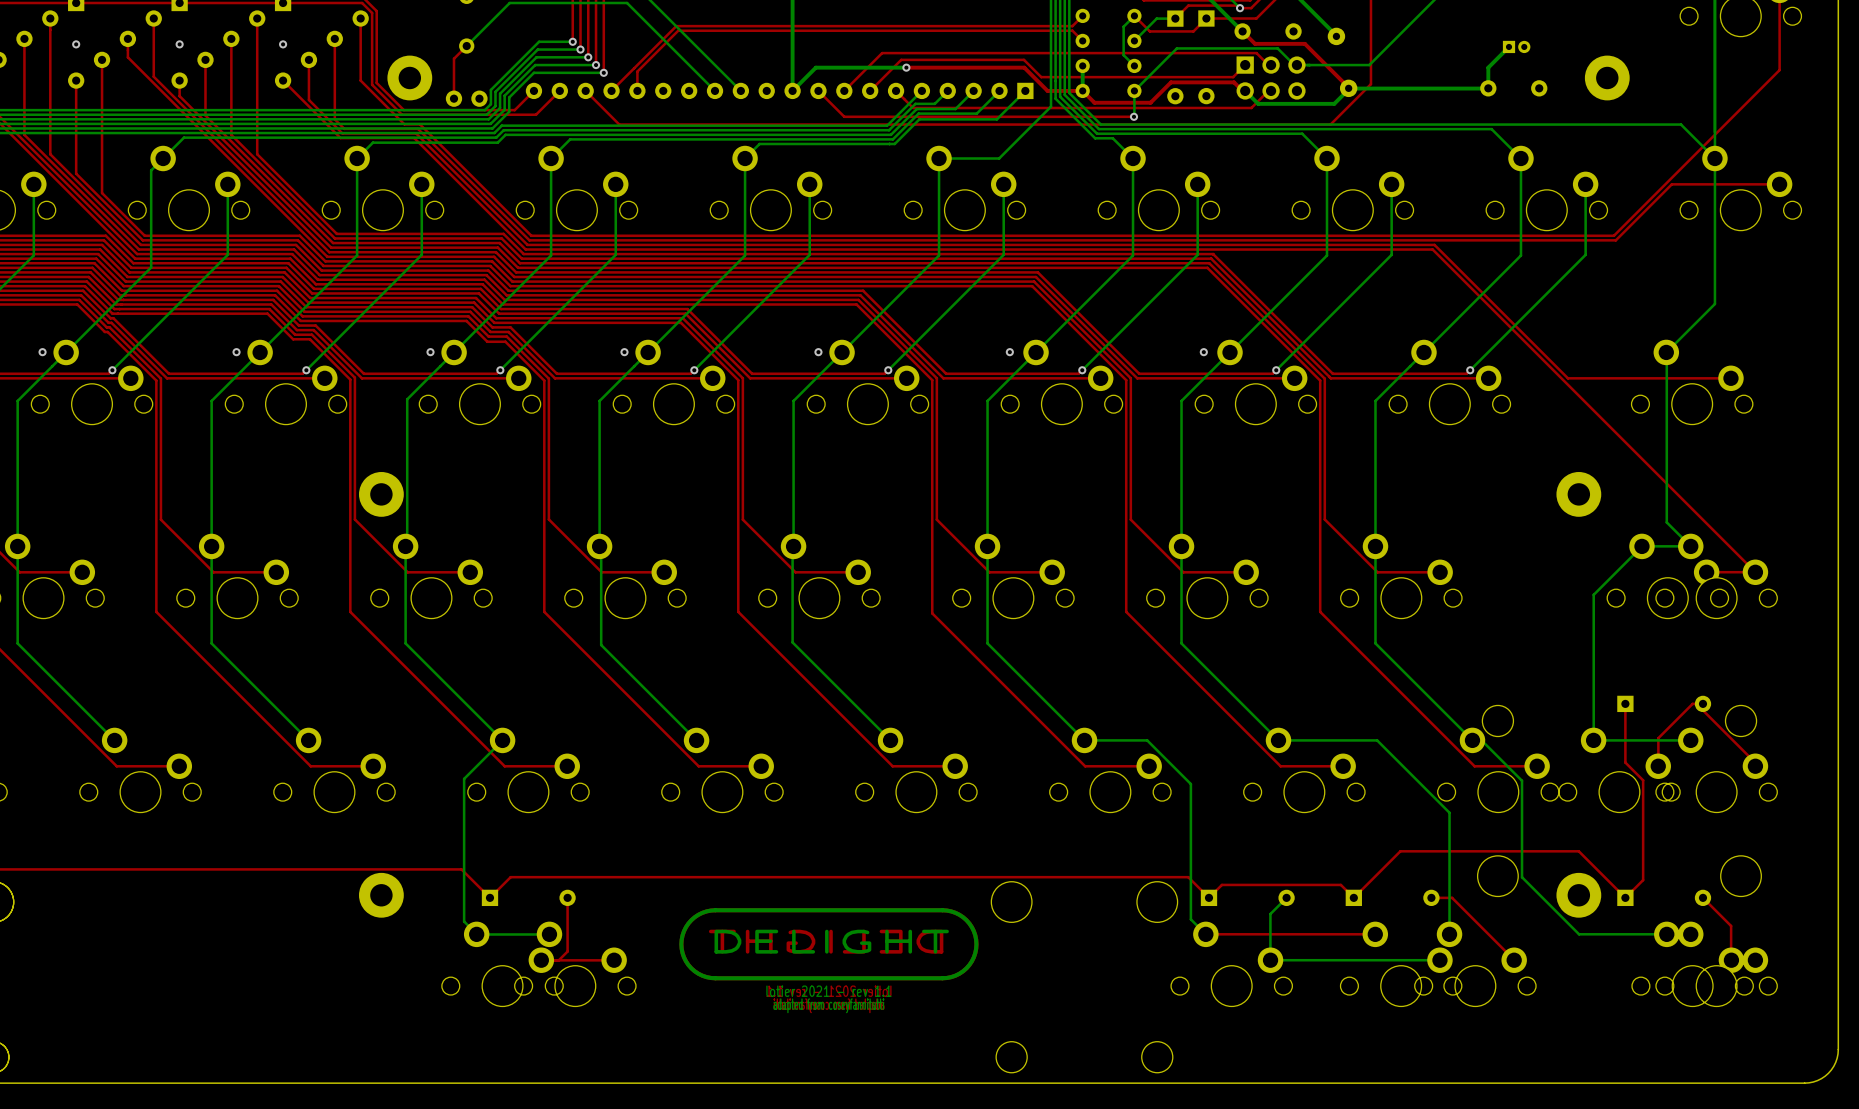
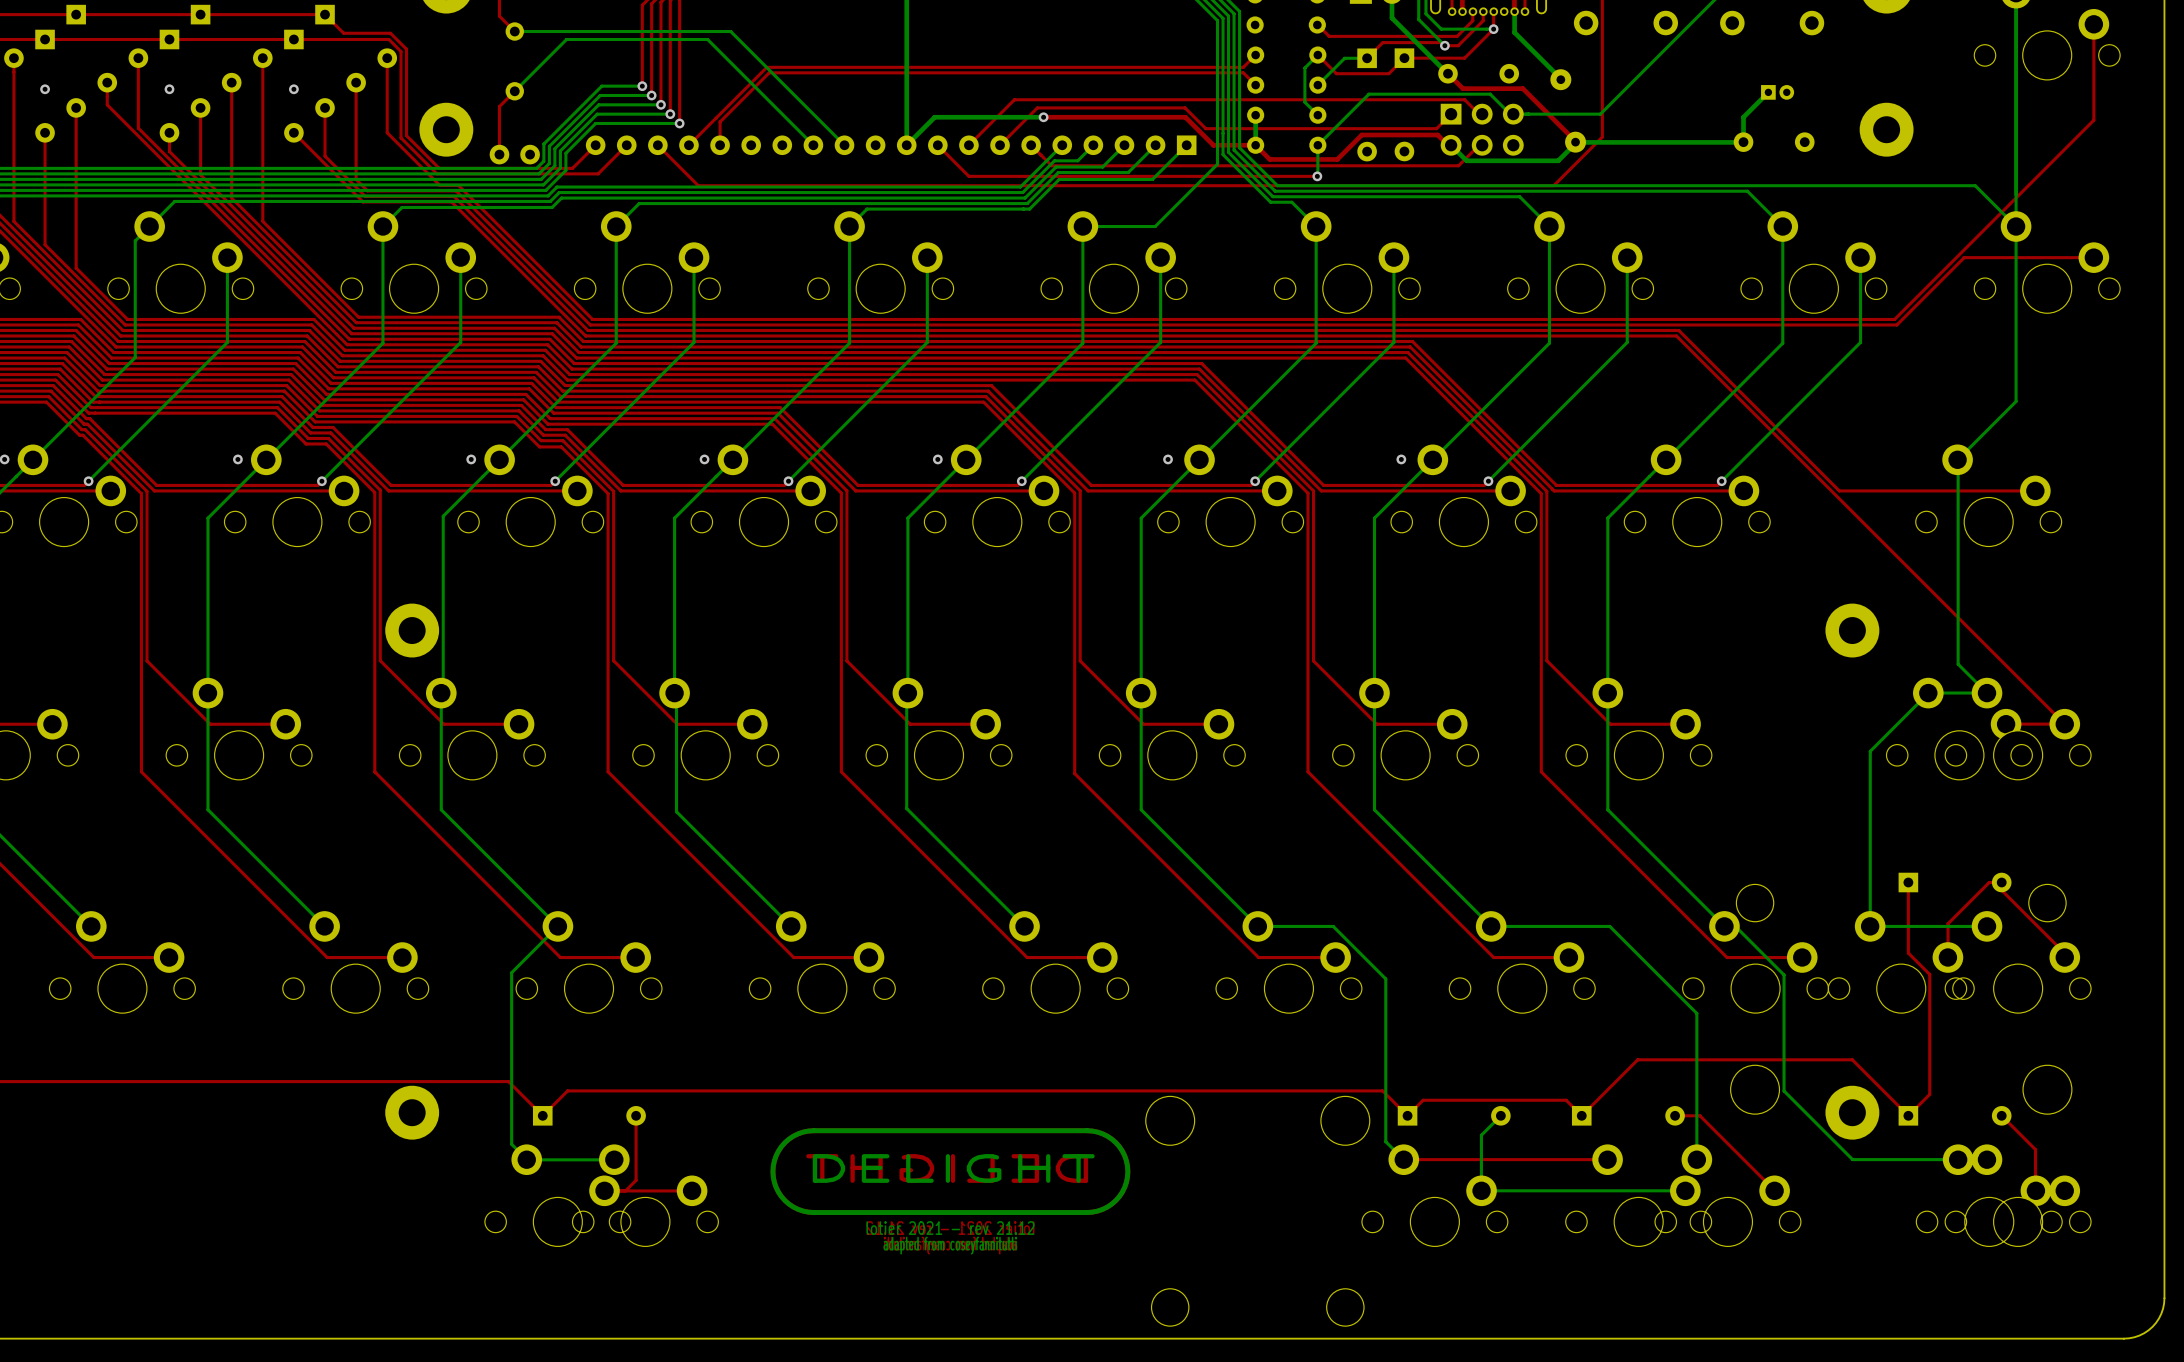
drawing: [679, 908, 979, 981] -> none
drawing: none -> [770, 1128, 1131, 1215]

